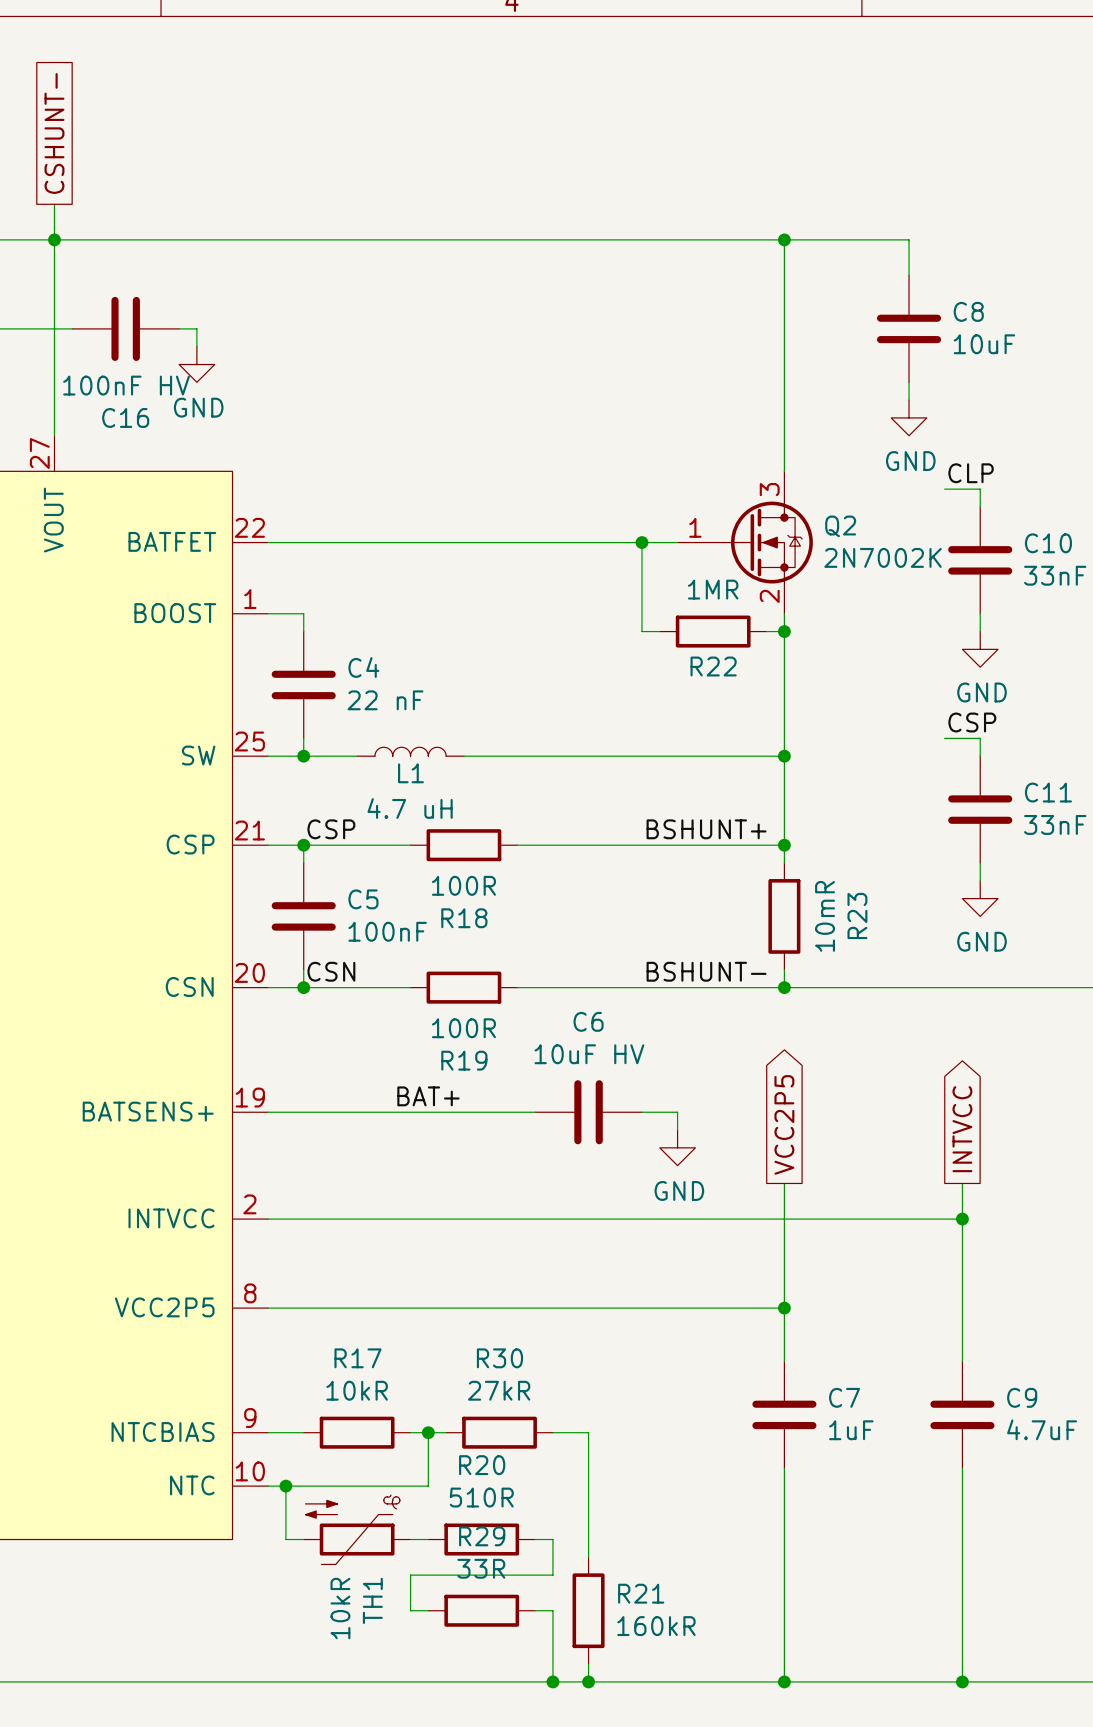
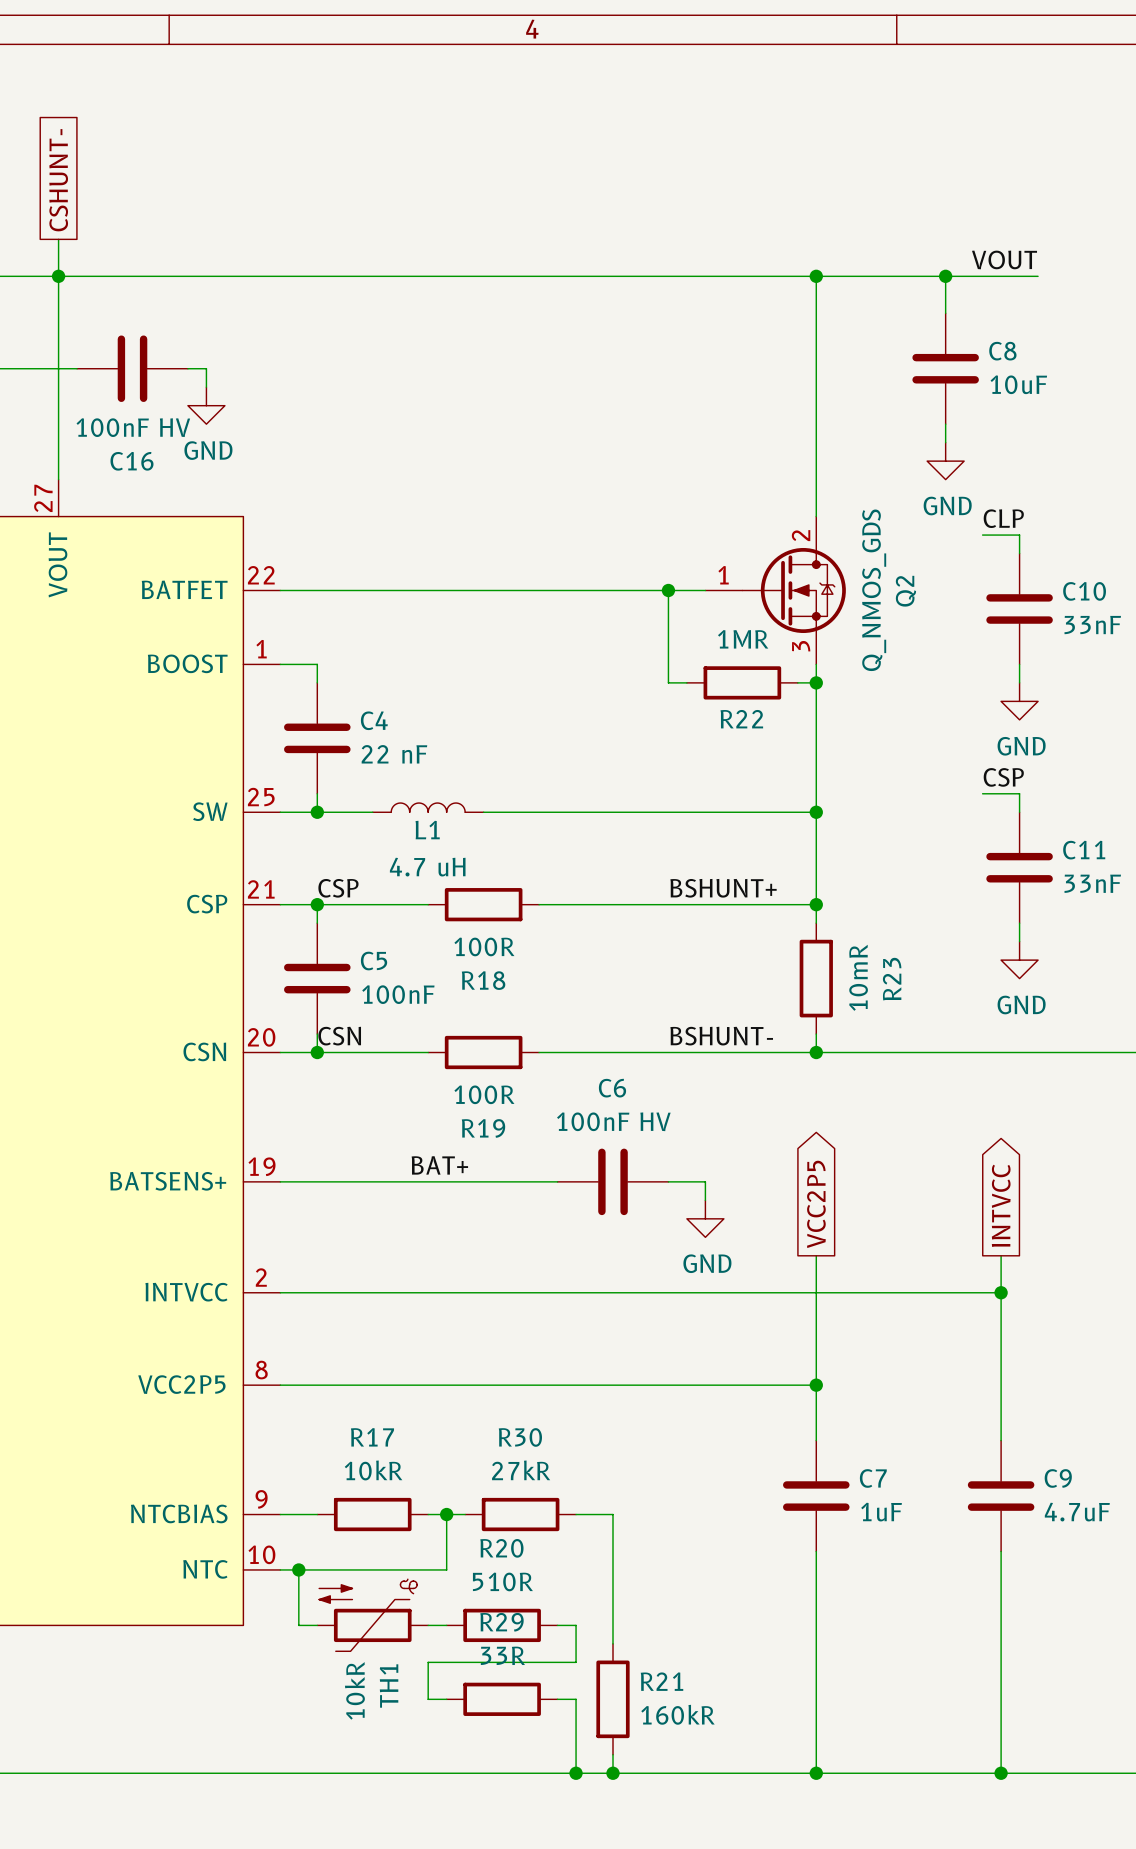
label: none -> VOUT (1004, 259)
wire: none -> (945, 276) (1038, 276)
junction: none -> (945, 276)
Q2 pin number: 3 (769, 489) -> 2 (801, 535)
Q2 name rotation: 0° (840, 526) -> 90° counterclockwise (905, 591)
Q2 value: 2N7002K (883, 557) -> Q_NMOS_GDS (874, 590)
Q2 pin number: 2 (769, 596) -> 3 (801, 646)
C6 value: 10uF HV (589, 1054) -> 100nF HV (613, 1121)

